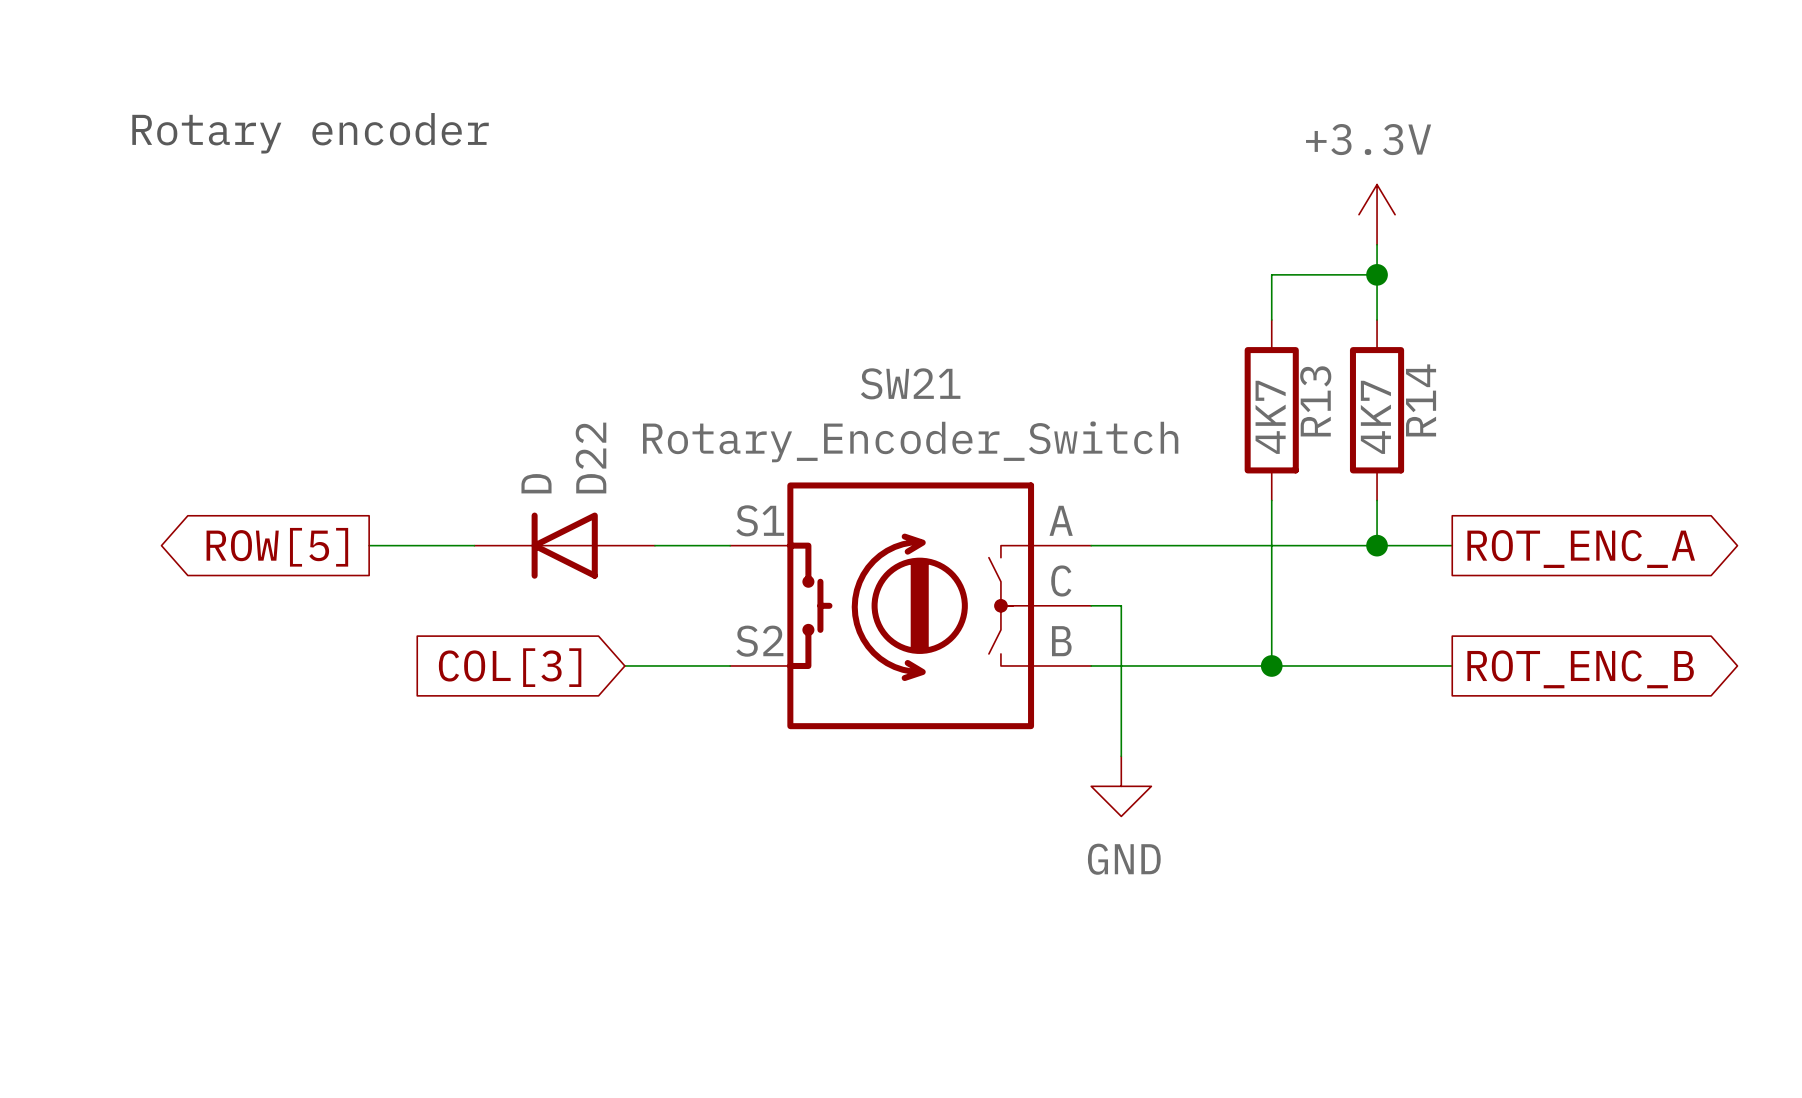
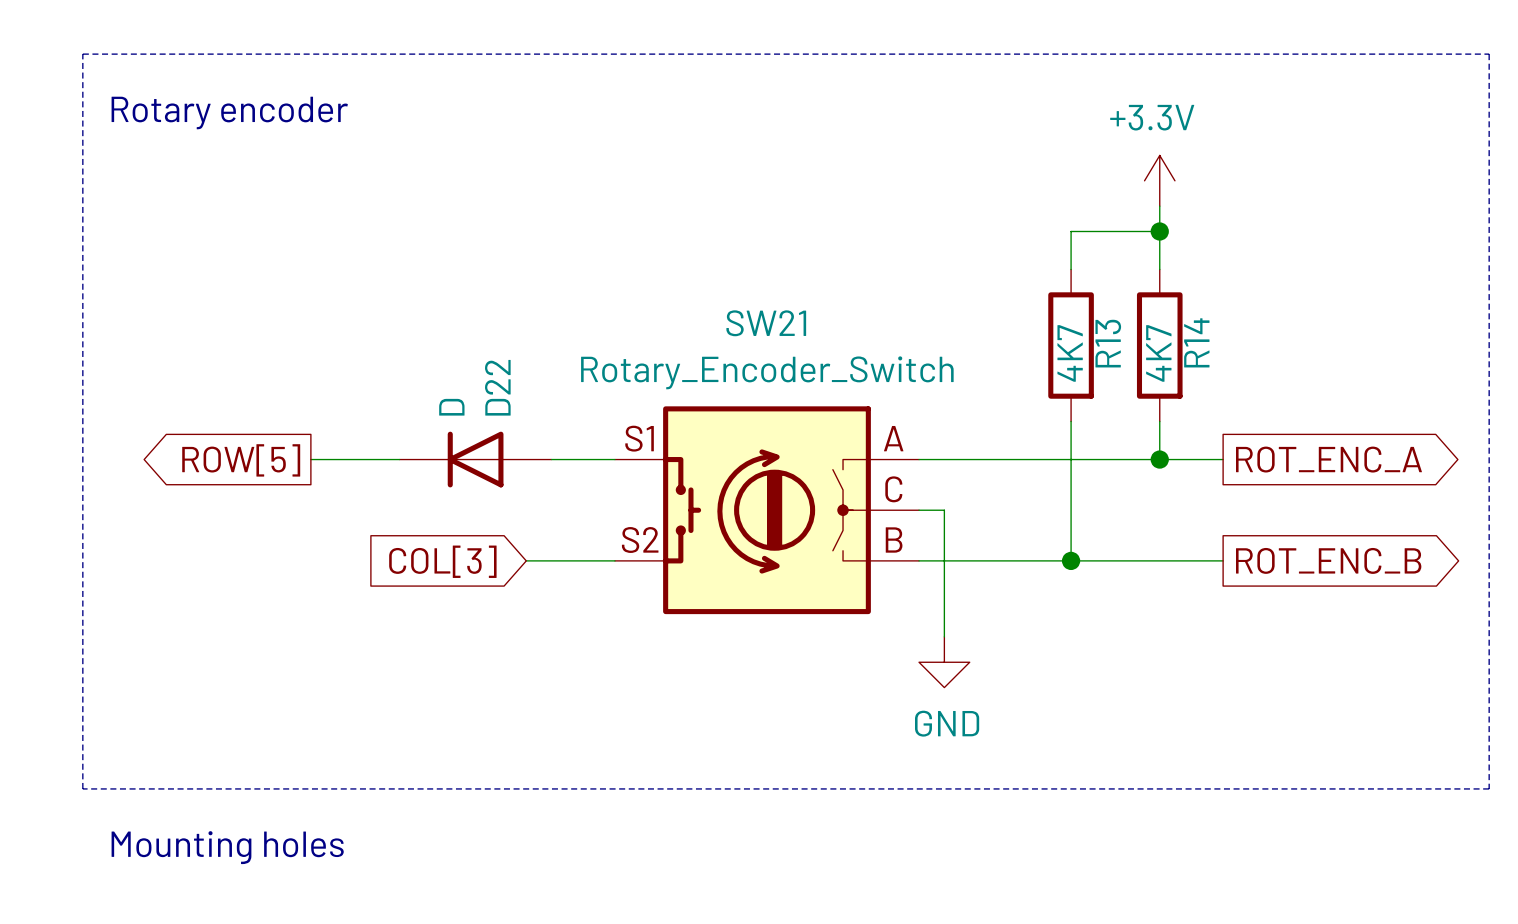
line: none -> (82, 54) (1489, 54) (1489, 788) (82, 788) (82, 54)
text: none -> Mounting holes (227, 847)

